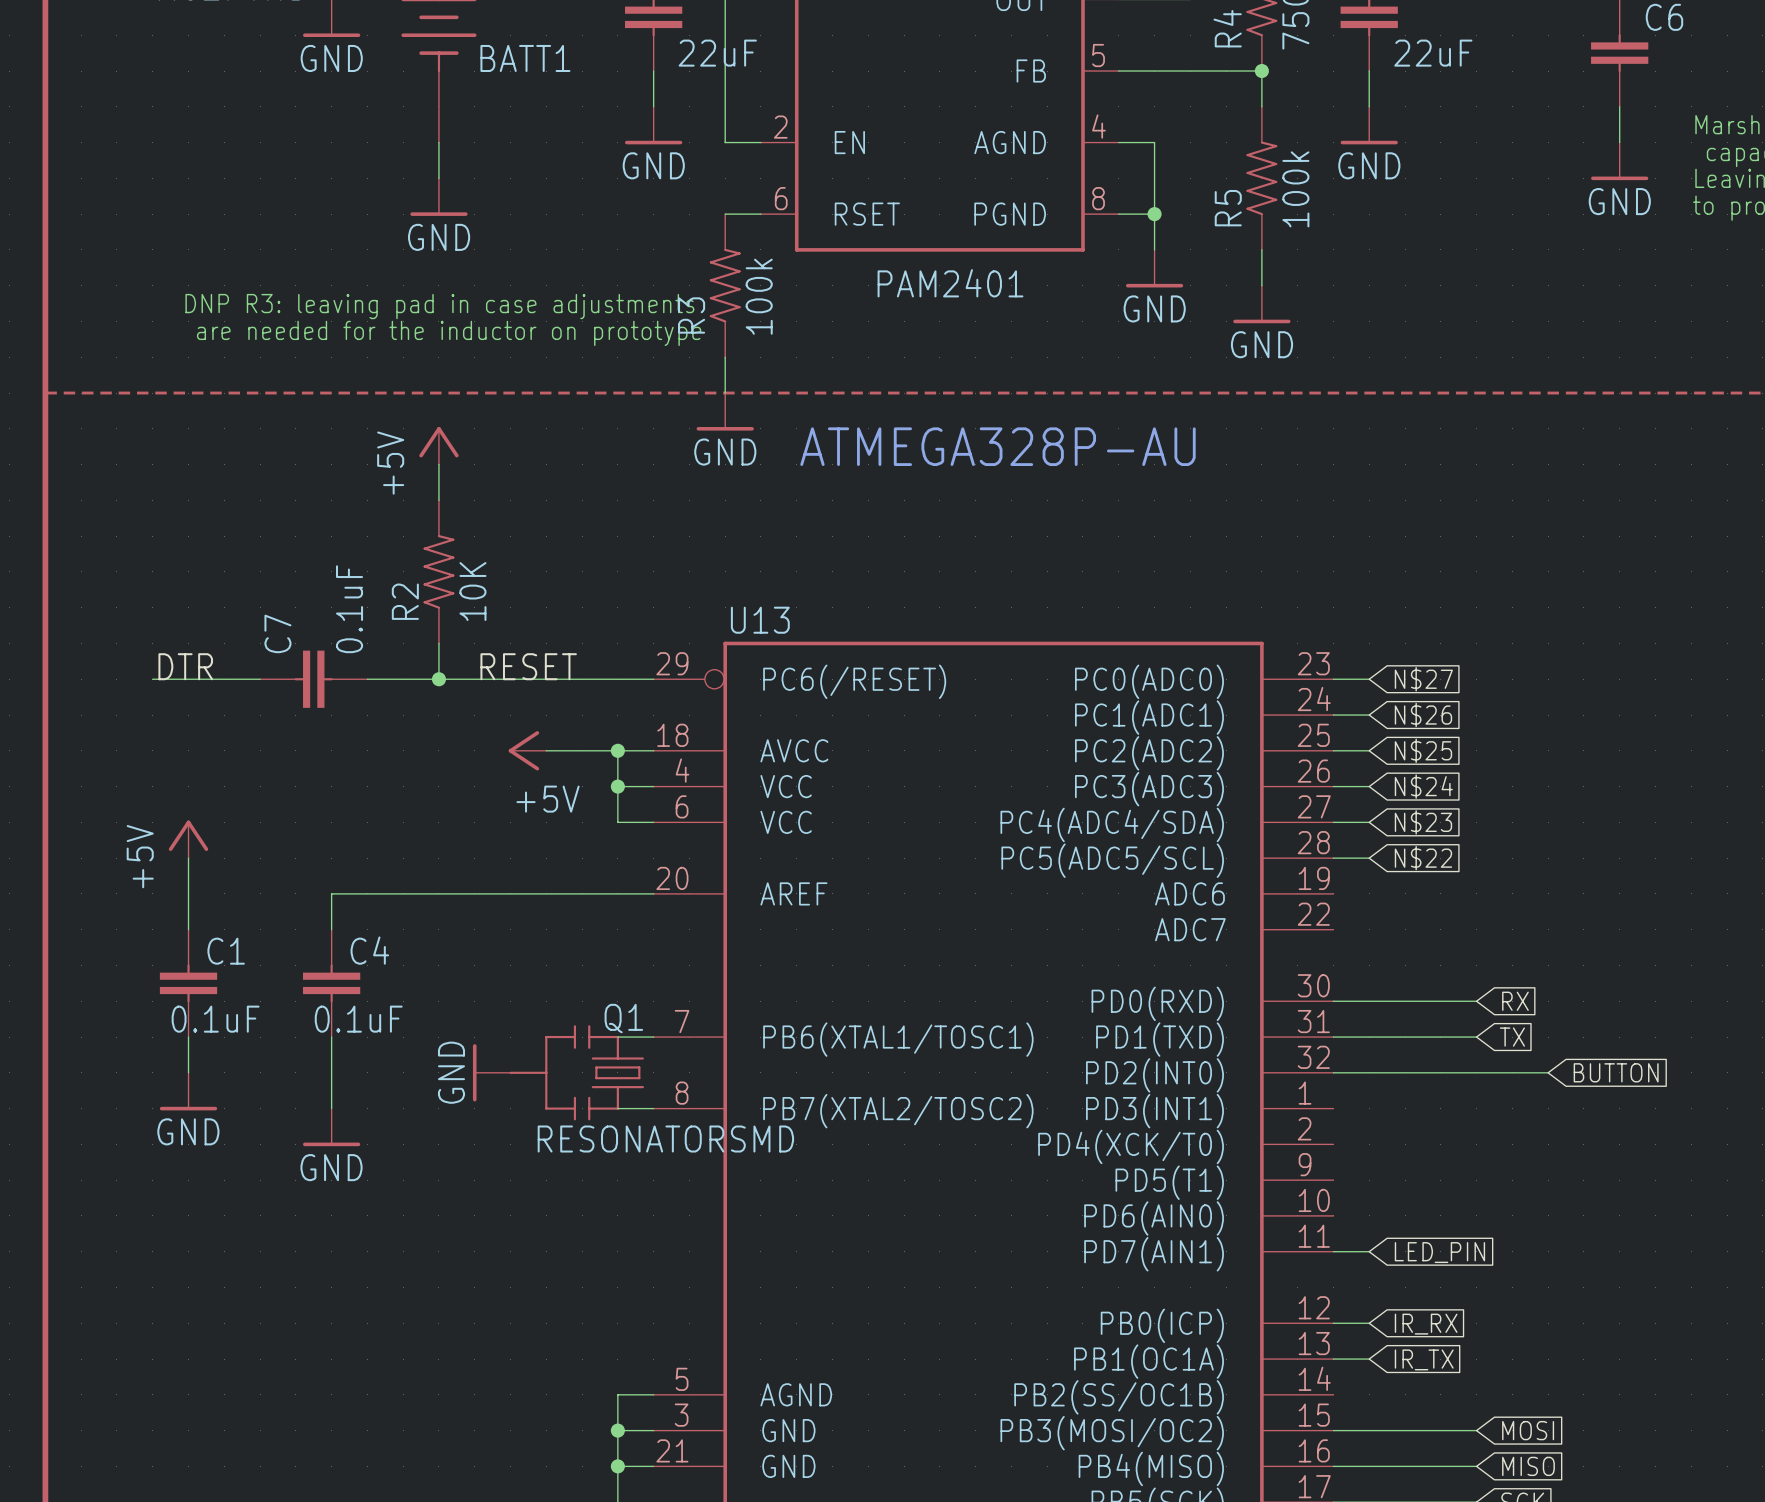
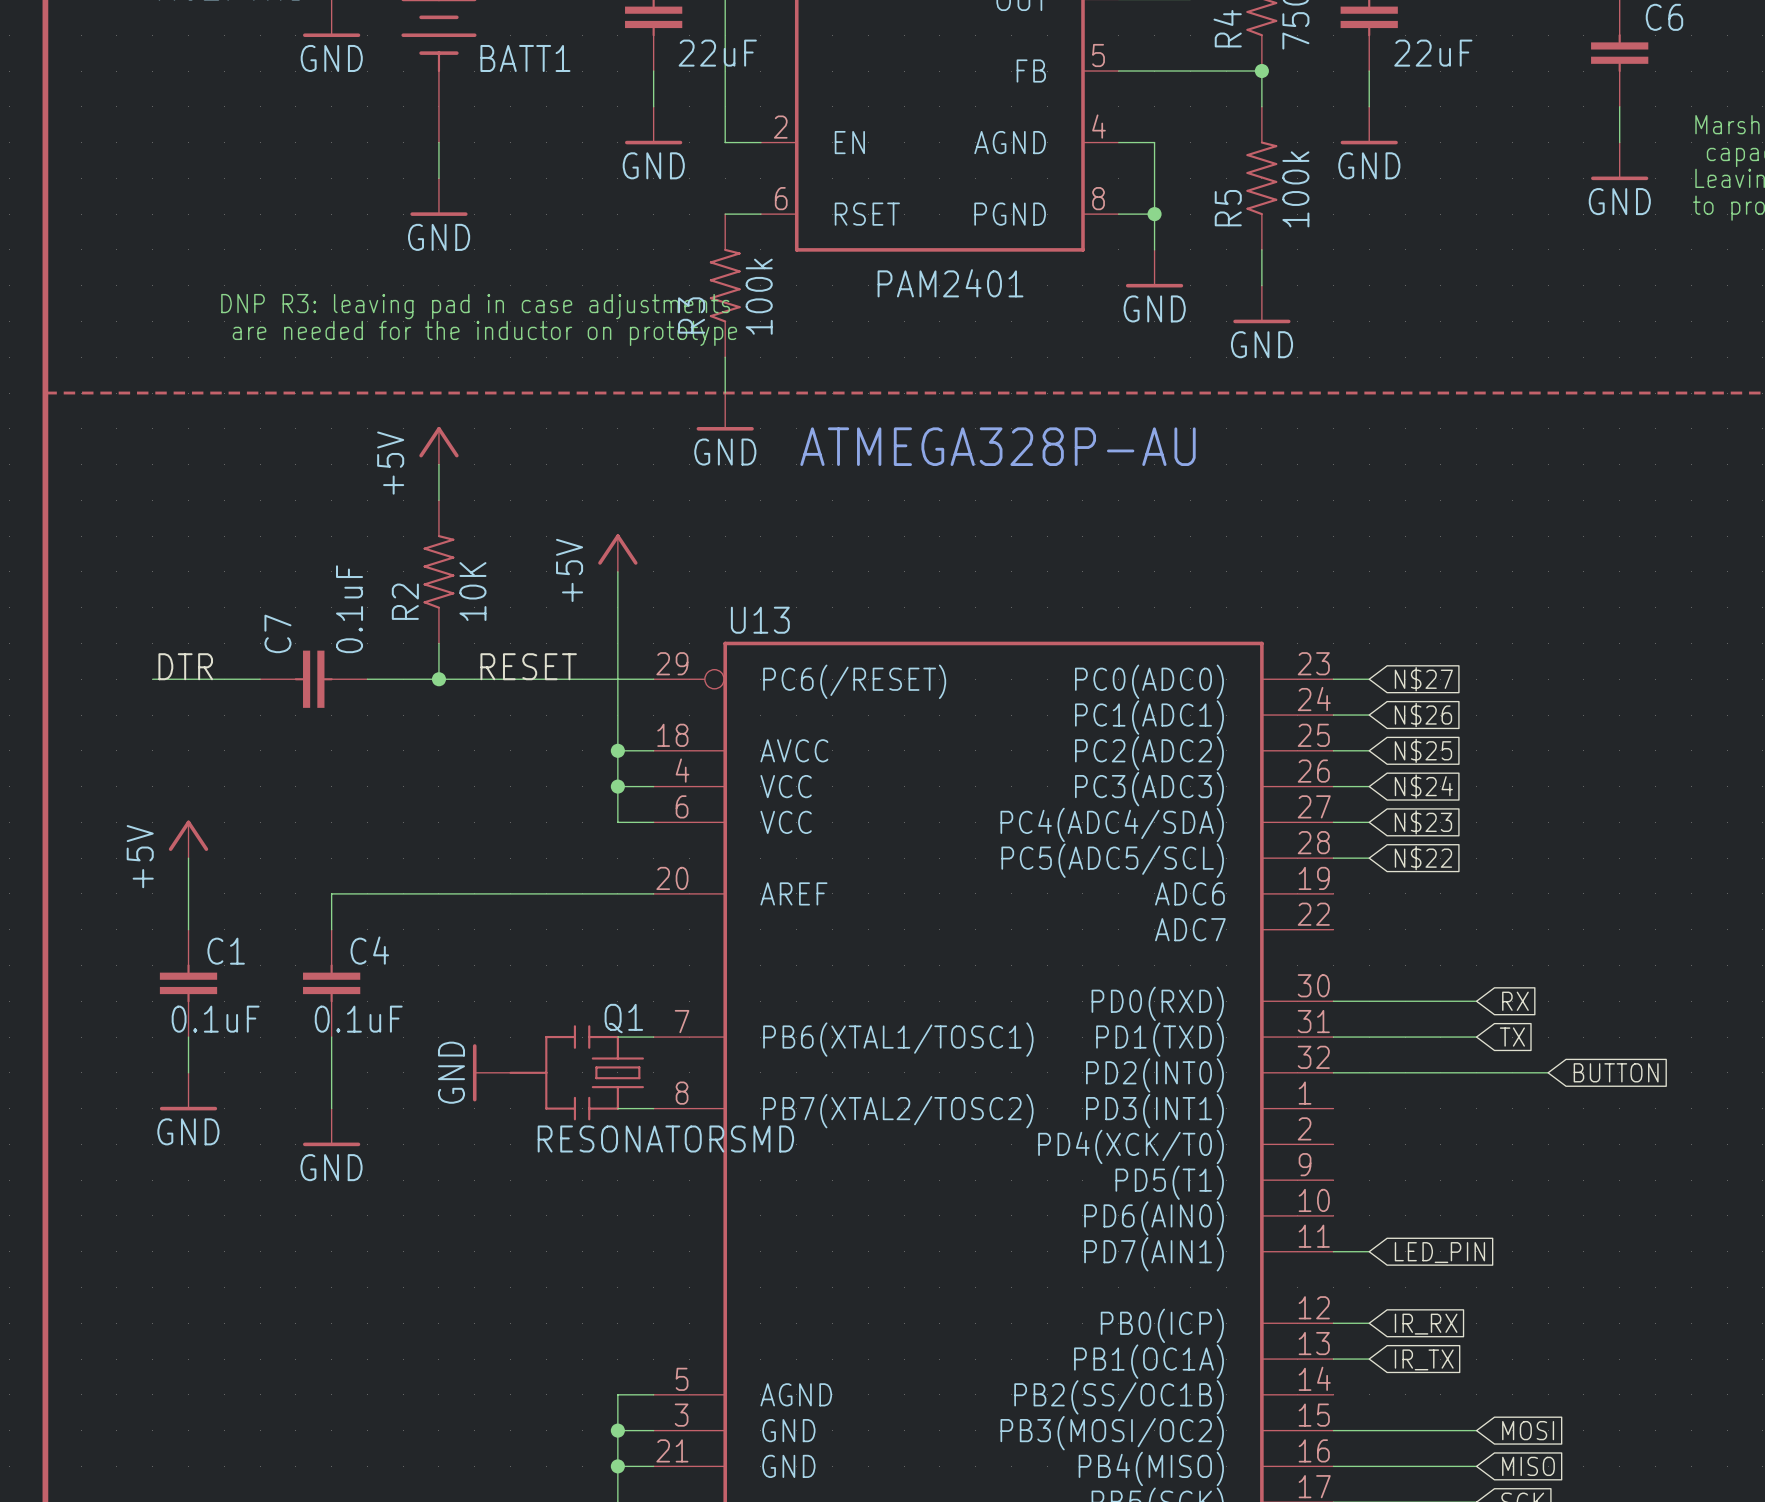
text position: DNP R3: leaving pad in case adjustments (439, 306) -> DNP R3: leaving pad in case adjustments (475, 306)
text position: are needed for the inductor on prototype (449, 333) -> are needed for the inductor on prototype (484, 333)
power symbol rotation: 0° (523, 750) -> 90° clockwise (617, 549)
power symbol position: +5V (527, 750) -> +5V (617, 553)
wire: (546, 750) (617, 750) -> (617, 571) (617, 750)

